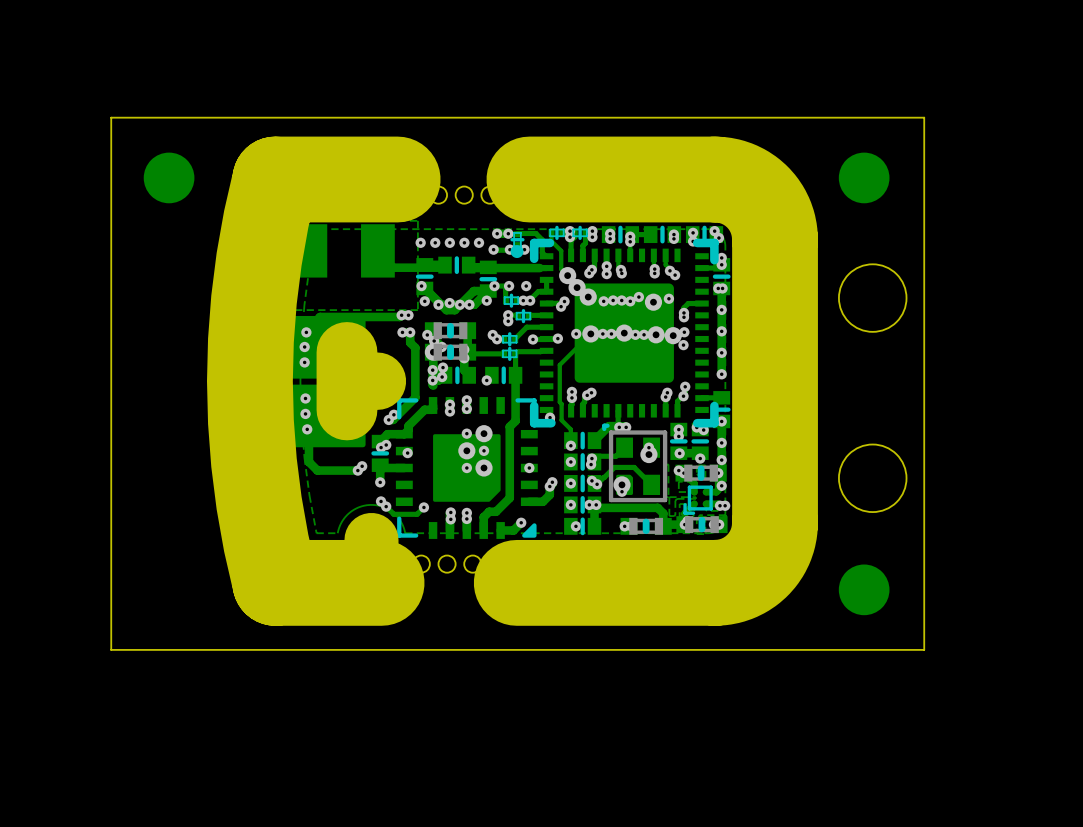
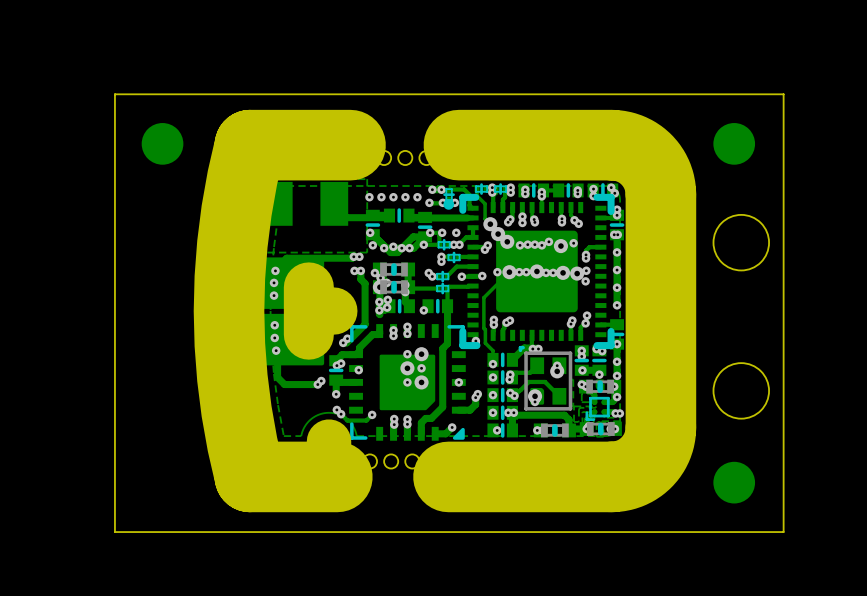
track: none -> (439, 244) (423, 244)

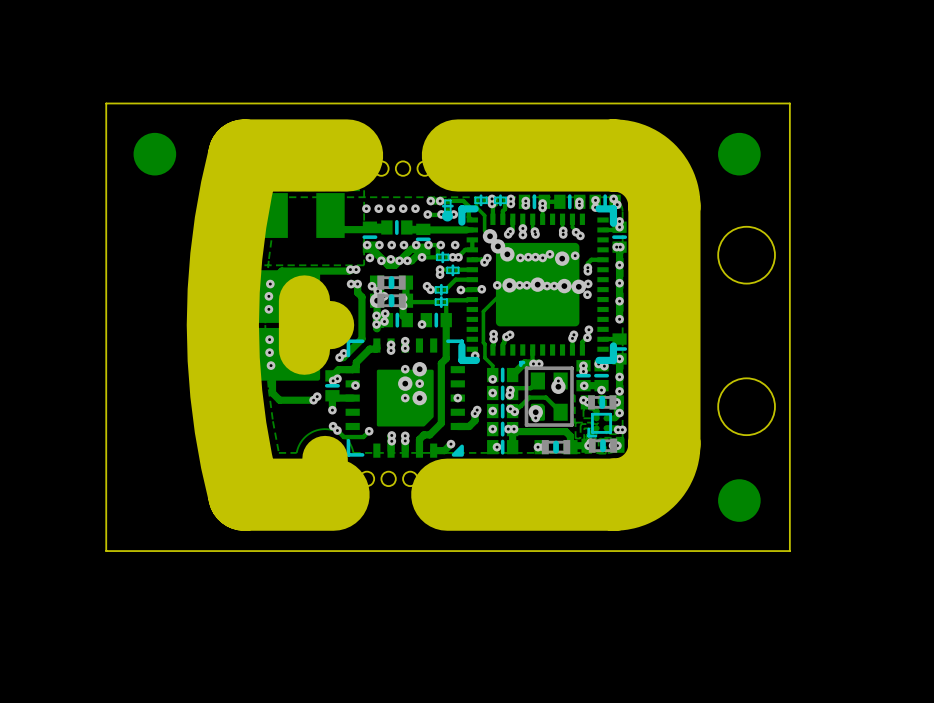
via: none -> (379, 245)
via: none -> (391, 245)
via: none -> (403, 245)
via: none -> (416, 245)

